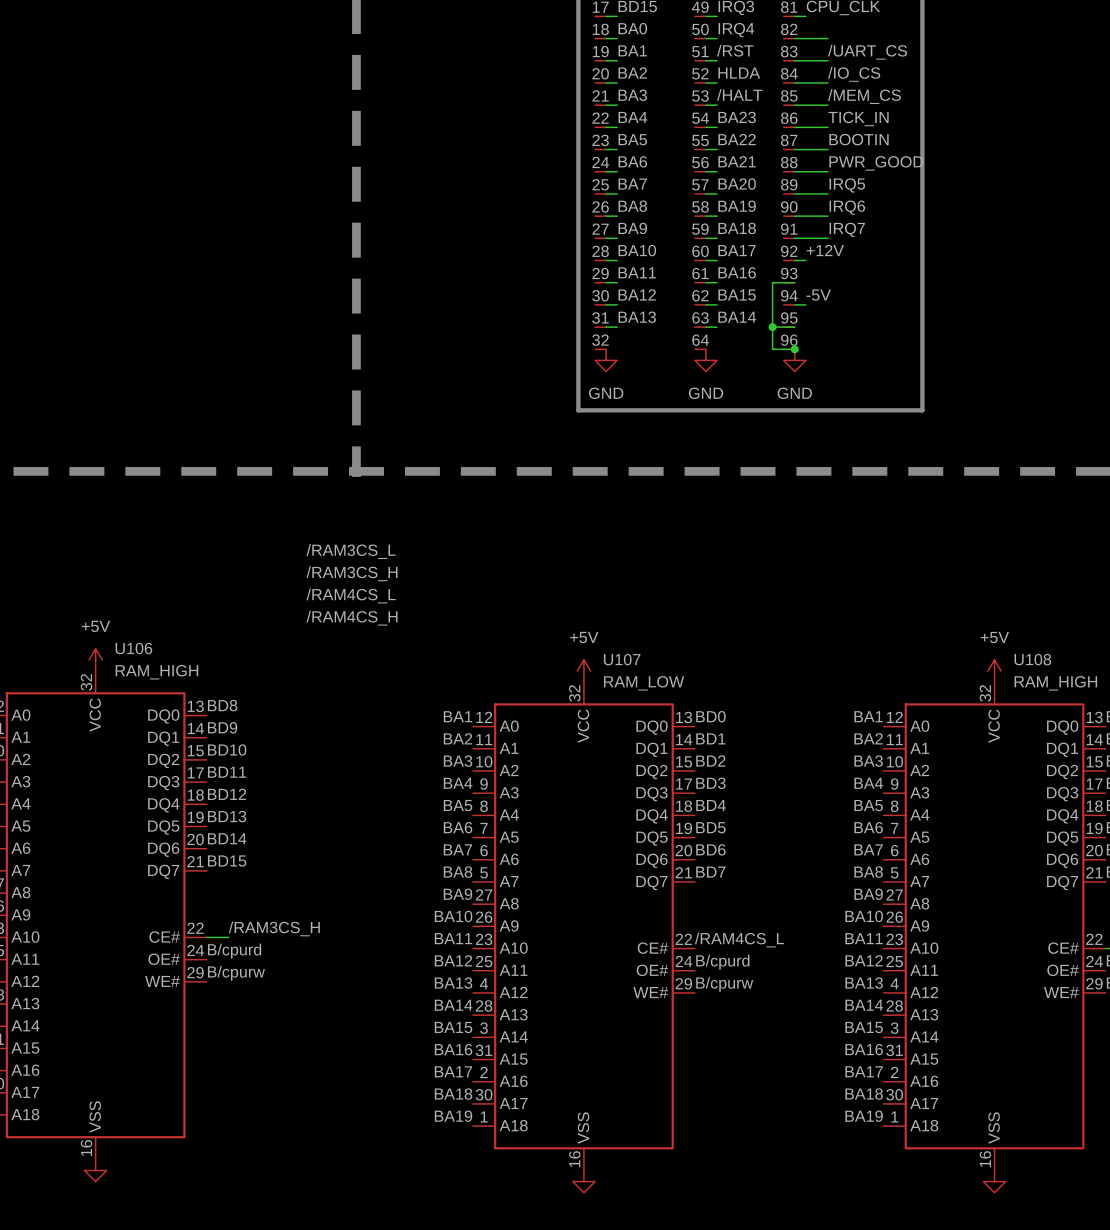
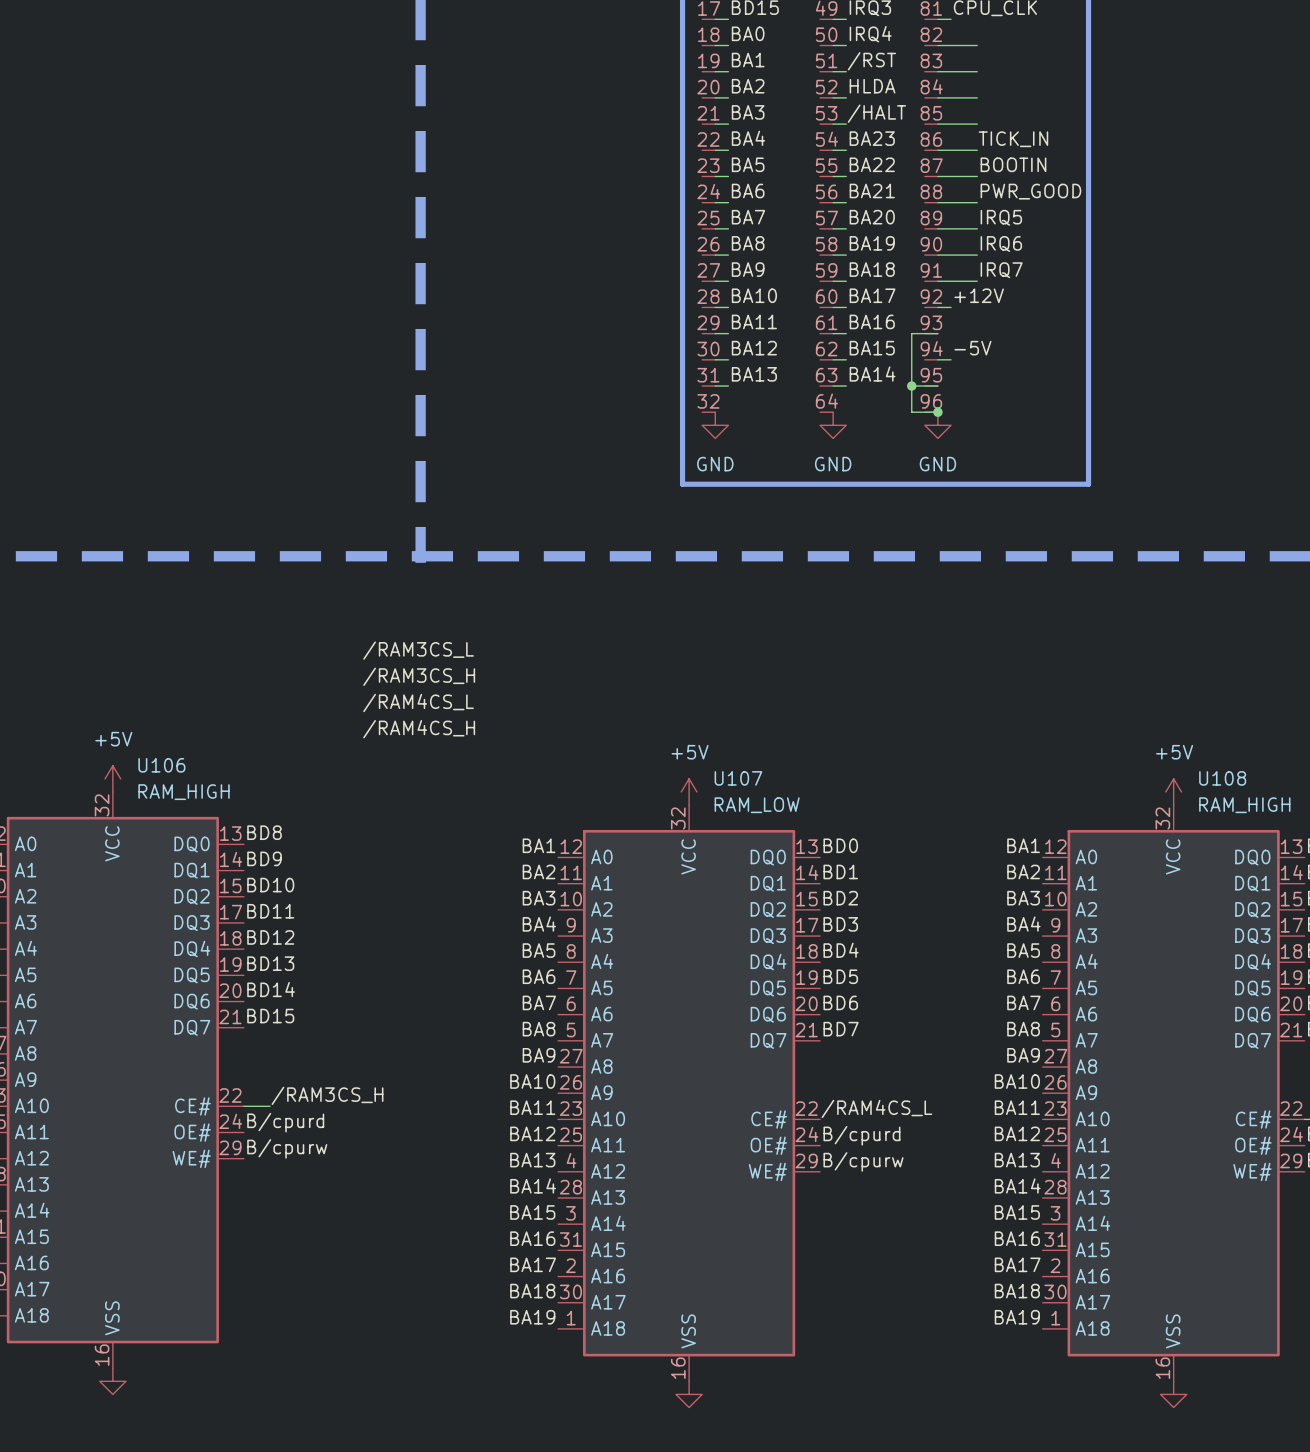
label: /UART_CS (867, 52) -> none
label: /IO_CS (854, 74) -> none
label: /MEM_CS (864, 96) -> none

